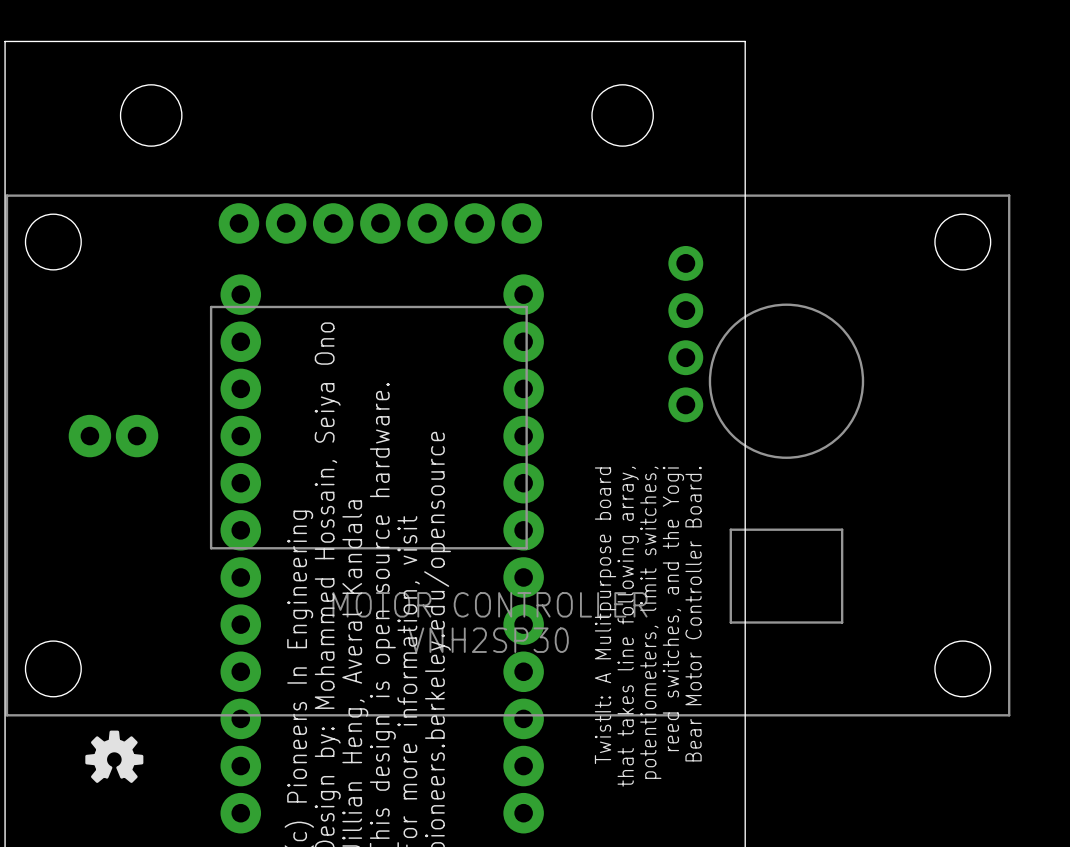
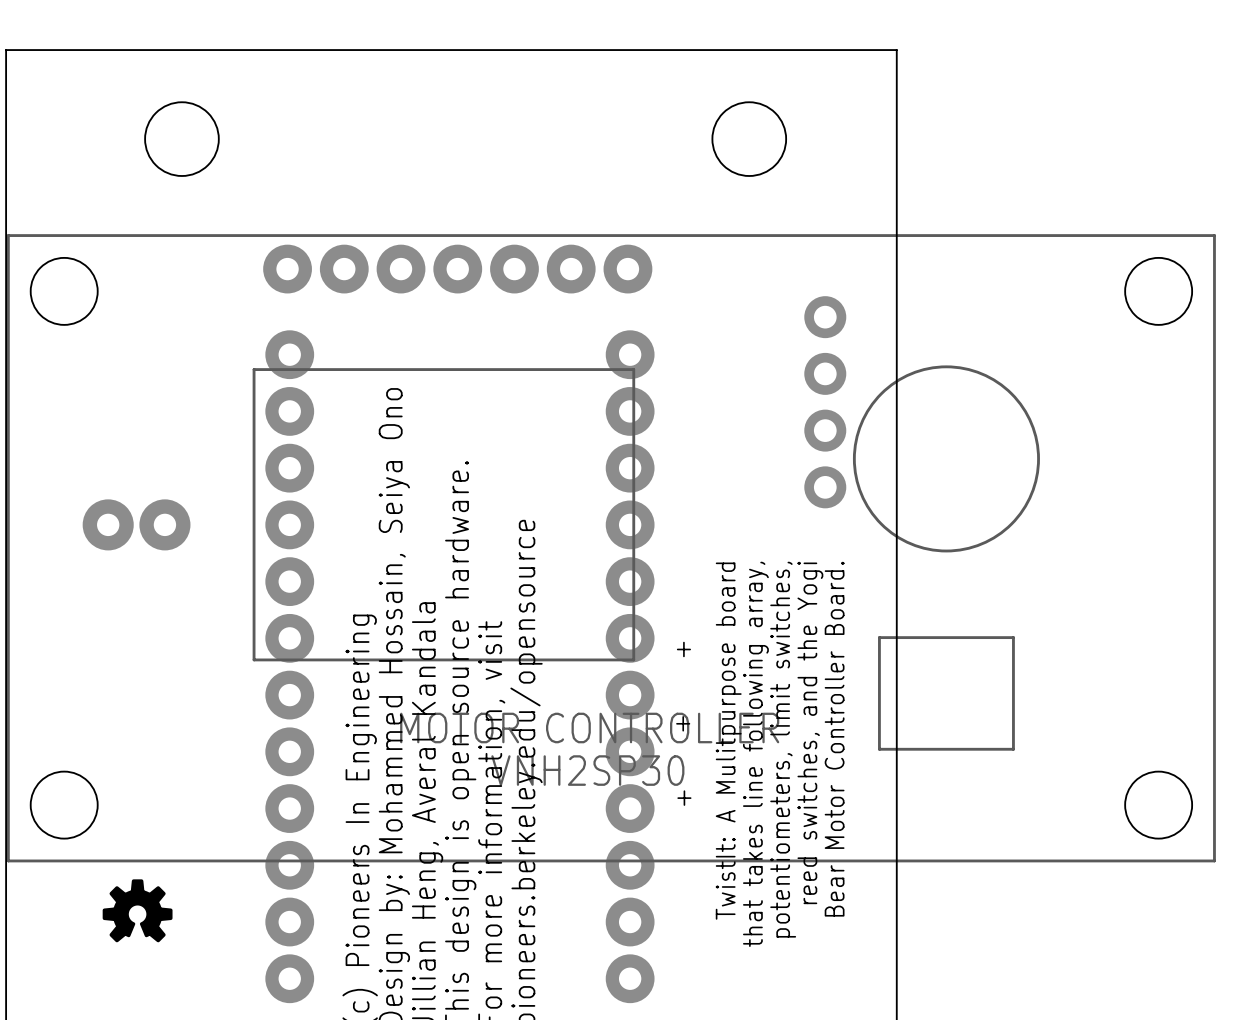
text: none -> + (683, 649)
text: none -> + (683, 723)
text: none -> + (684, 798)

